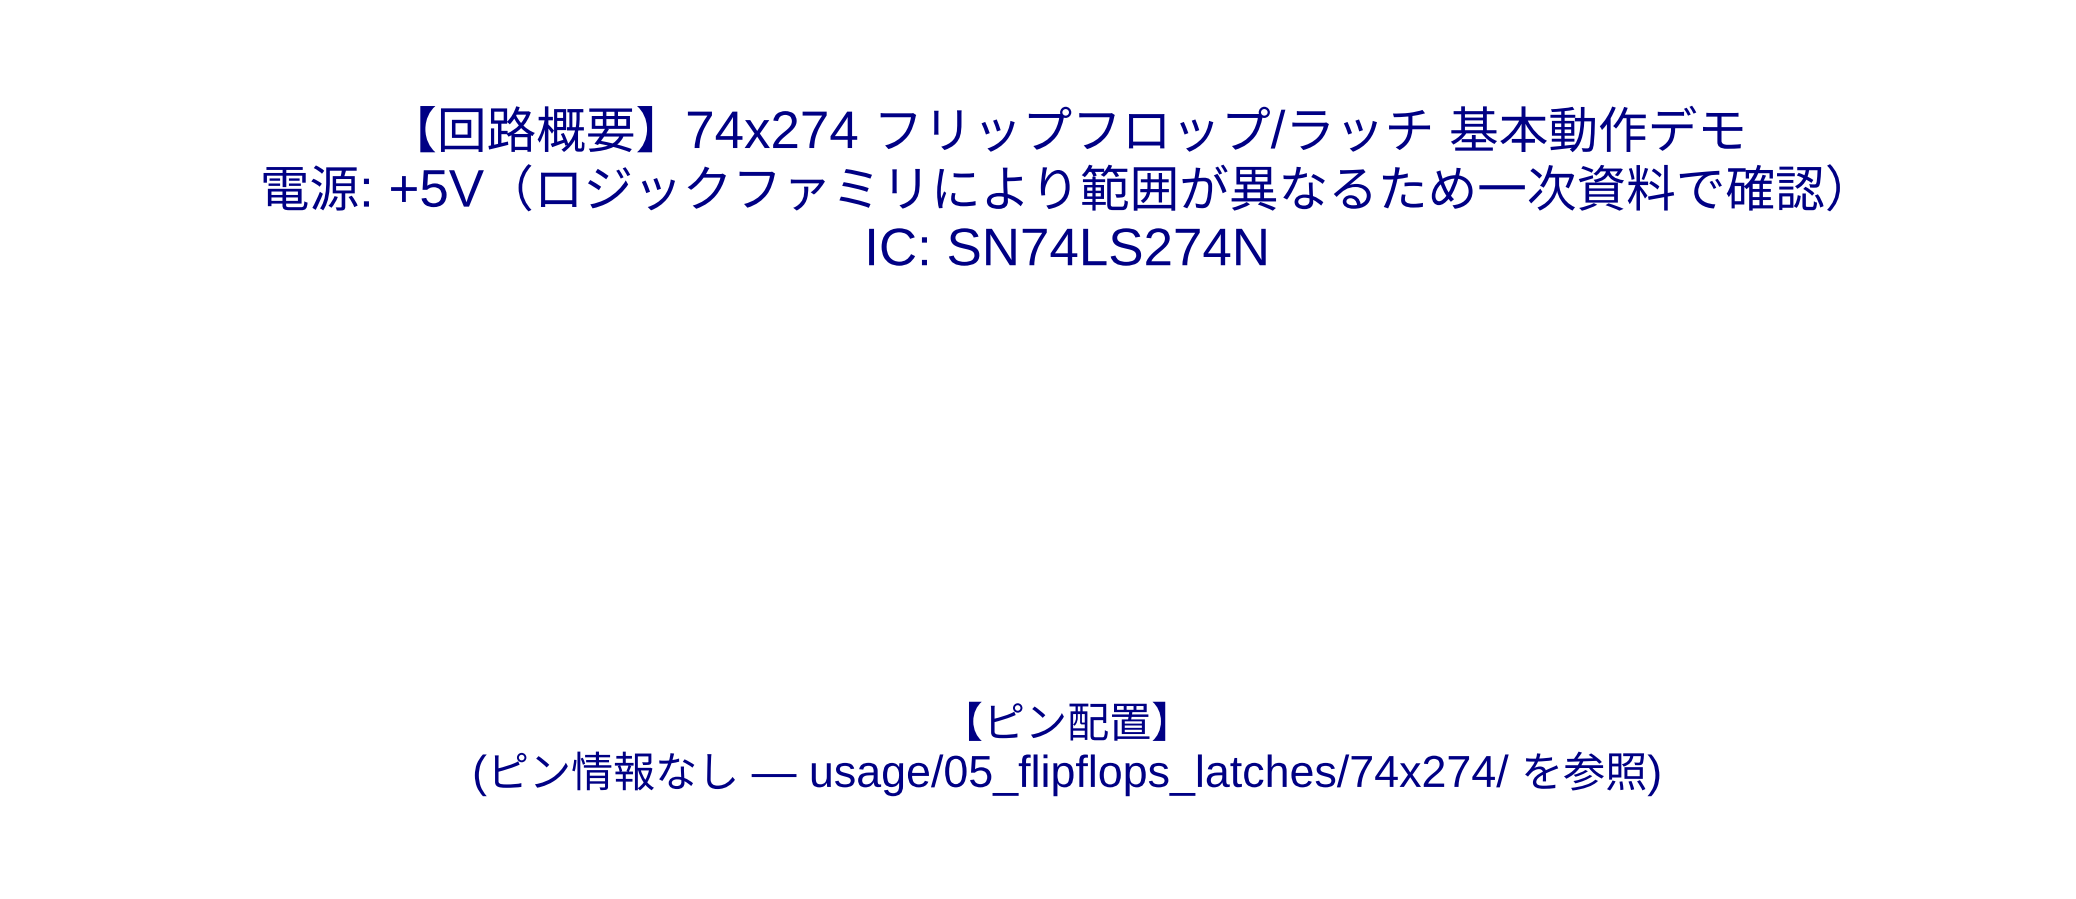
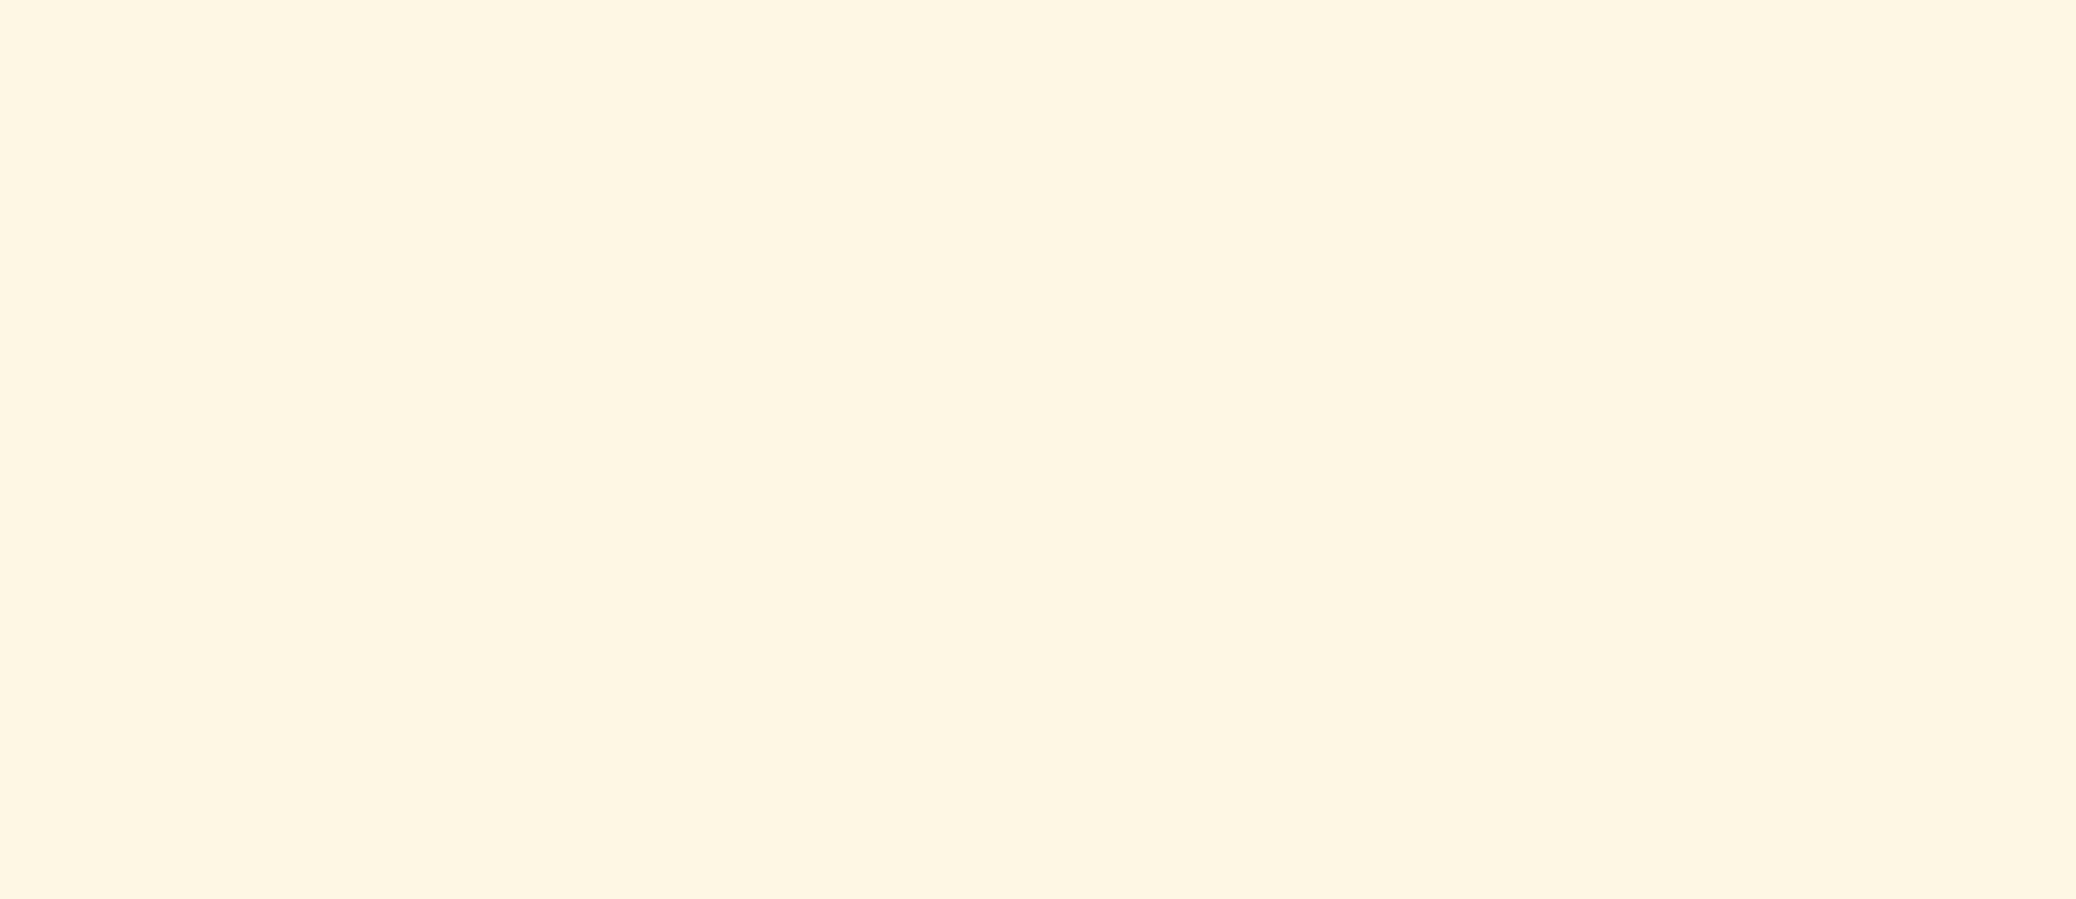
text: 【回路概要】74x274 フリップフロップ/ラッチ 基本動作デモ (1081, 129) -> none
text: 電源: +5V（ロジックファミリにより範囲が異なるため一次資料で確認） (1051, 187) -> none
text: IC: SN74LS274N (1067, 247) -> none
text: 【ピン配置】 (1067, 721) -> none
text: (ピン情報なし — usage/05_flipflops_latches/74x274/ を参照) (1067, 773) -> none

